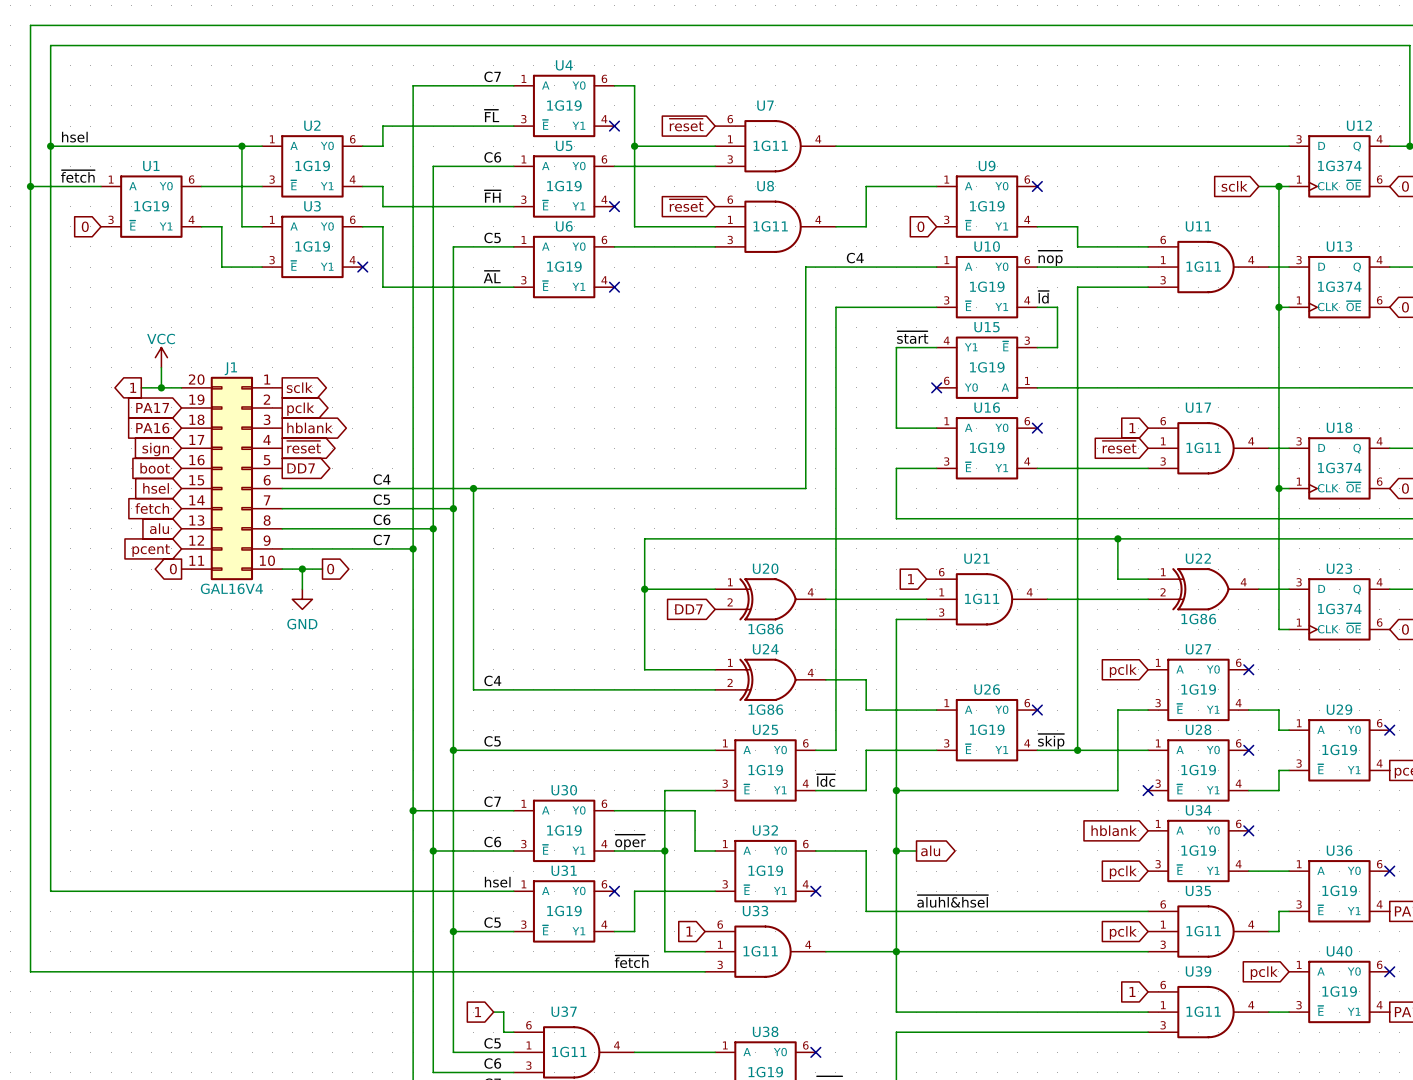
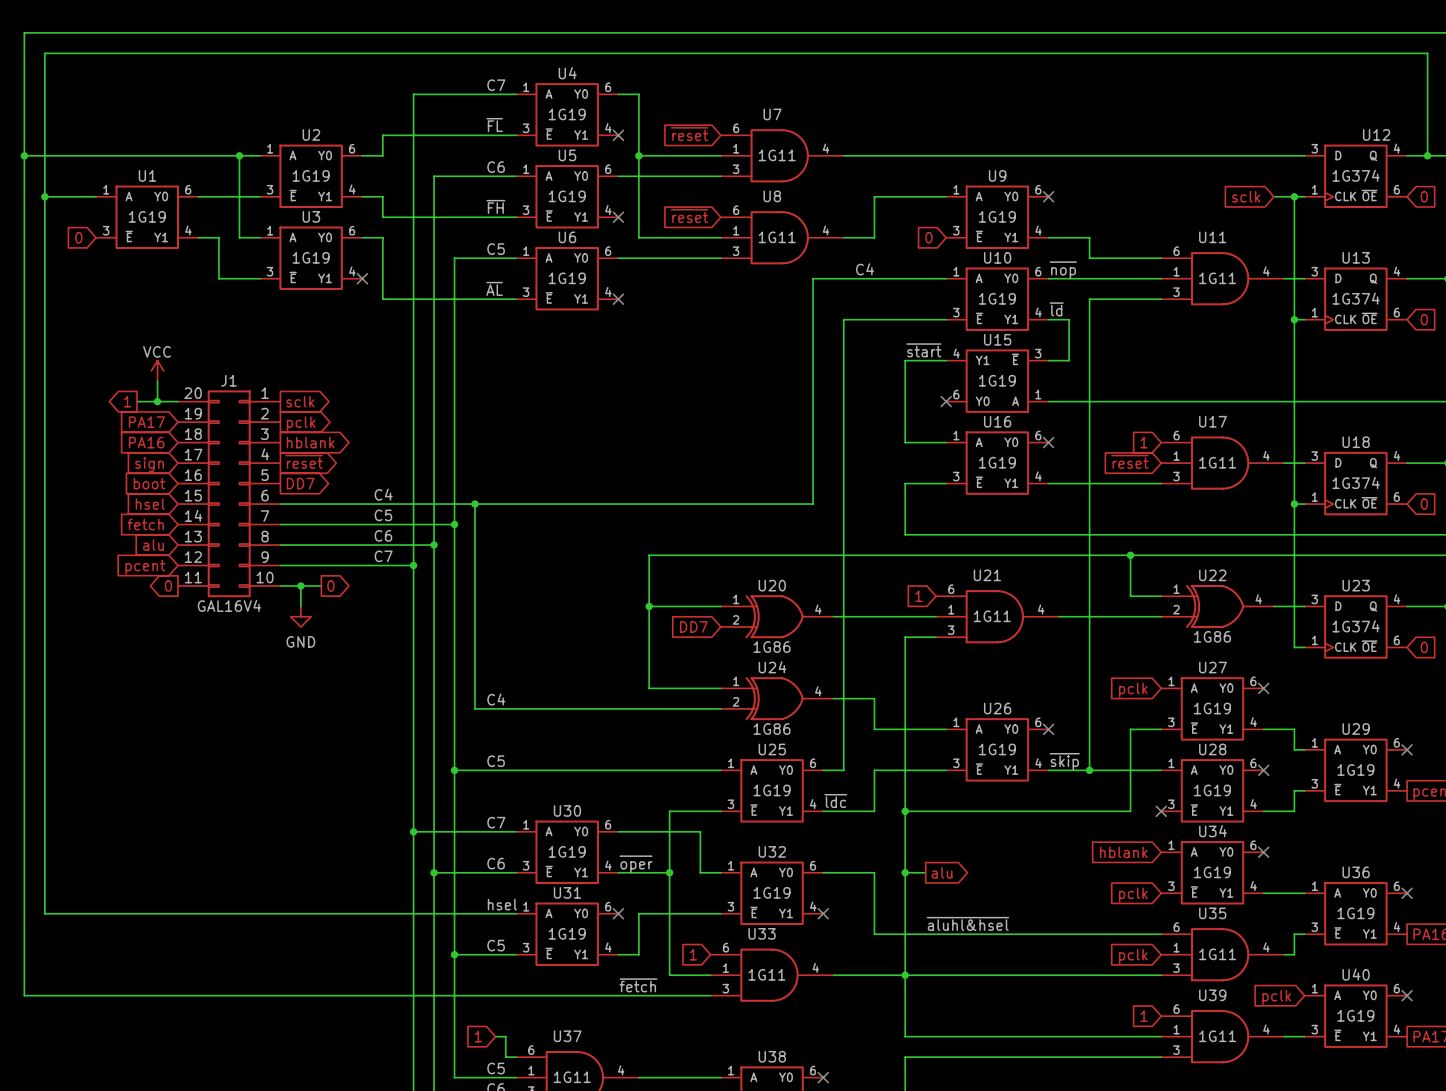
label: hsel (74, 137) -> none
junction: none -> (24, 155)
junction: (50, 146) -> none
label: ~{fetch} (77, 176) -> none
wire: (30, 186) (50, 186) -> (24, 155) (44, 155)
junction: (30, 186) -> none
junction: none -> (44, 196)

